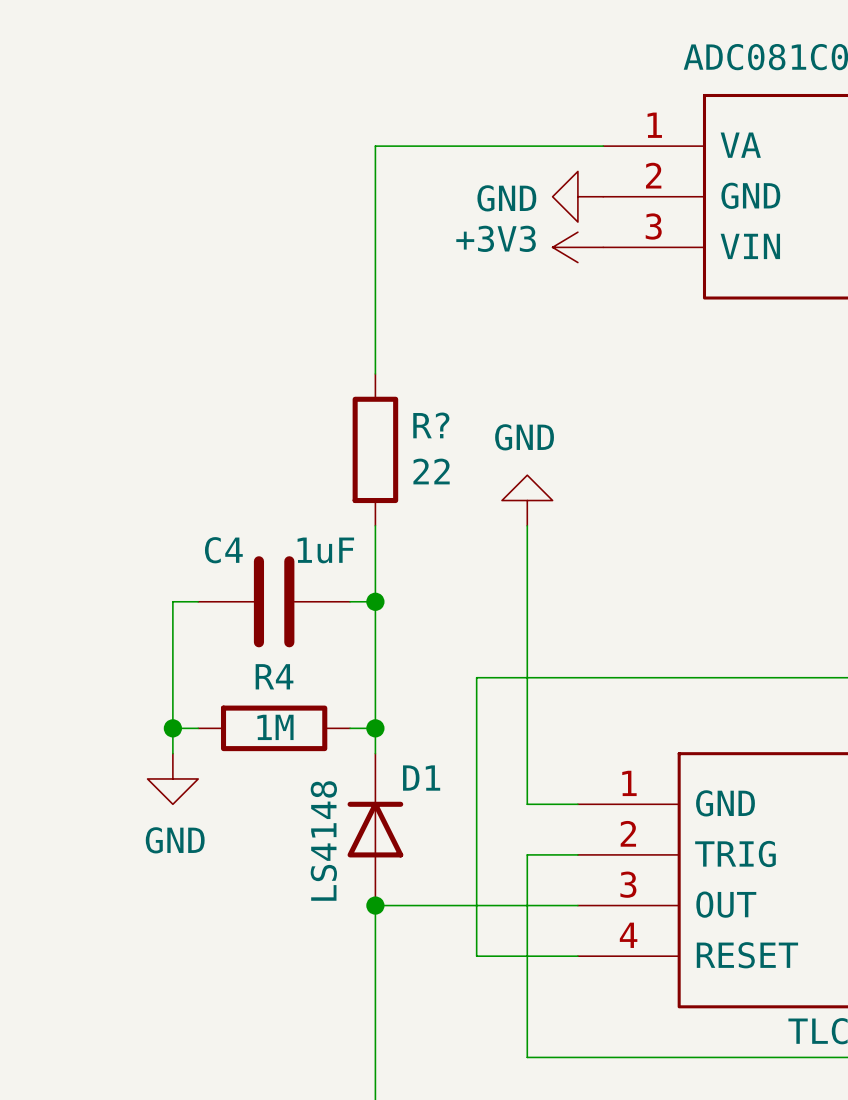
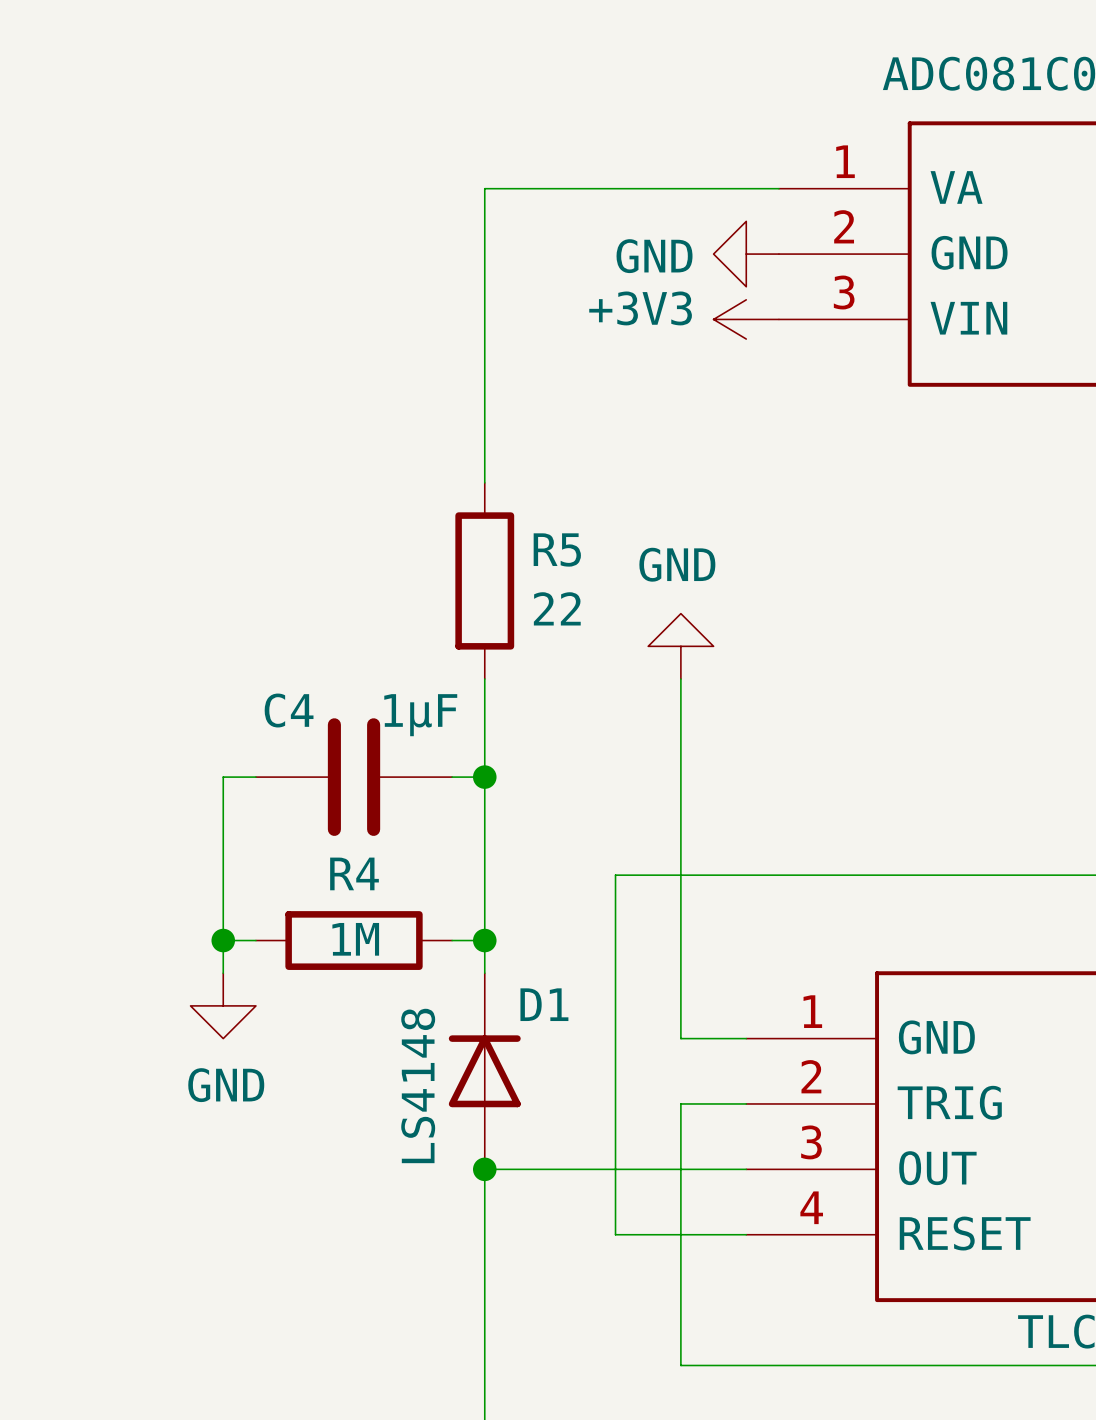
R? name: R? (431, 425) -> R5 (557, 549)
C4 value: 1uF (325, 550) -> 1μF (420, 715)

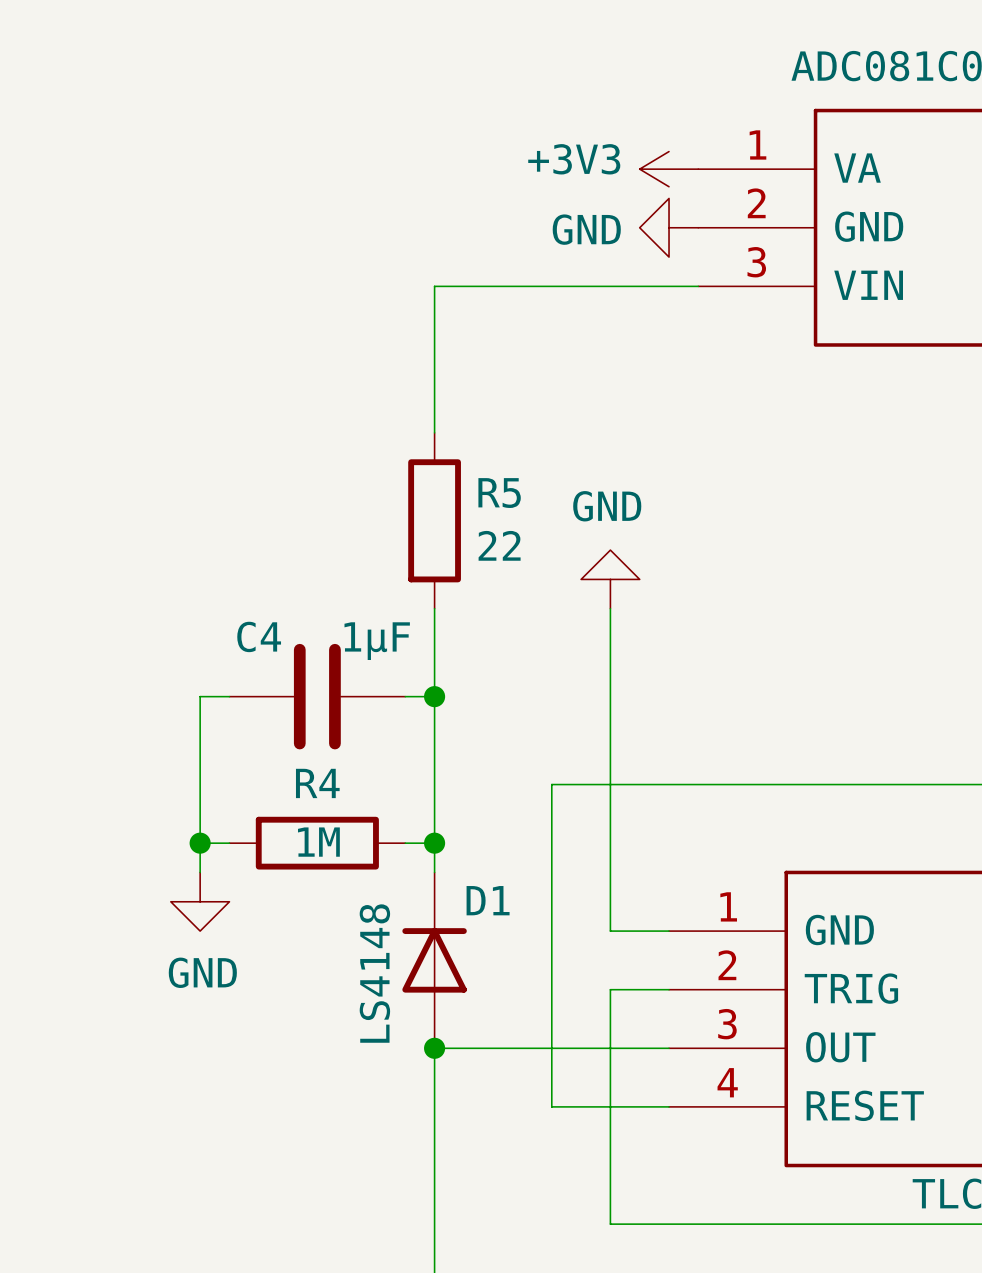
wire: (778, 188) (484, 188) (484, 319) -> (698, 286) (434, 286)
power symbol position: +3V3 (746, 319) -> +3V3 (669, 169)

